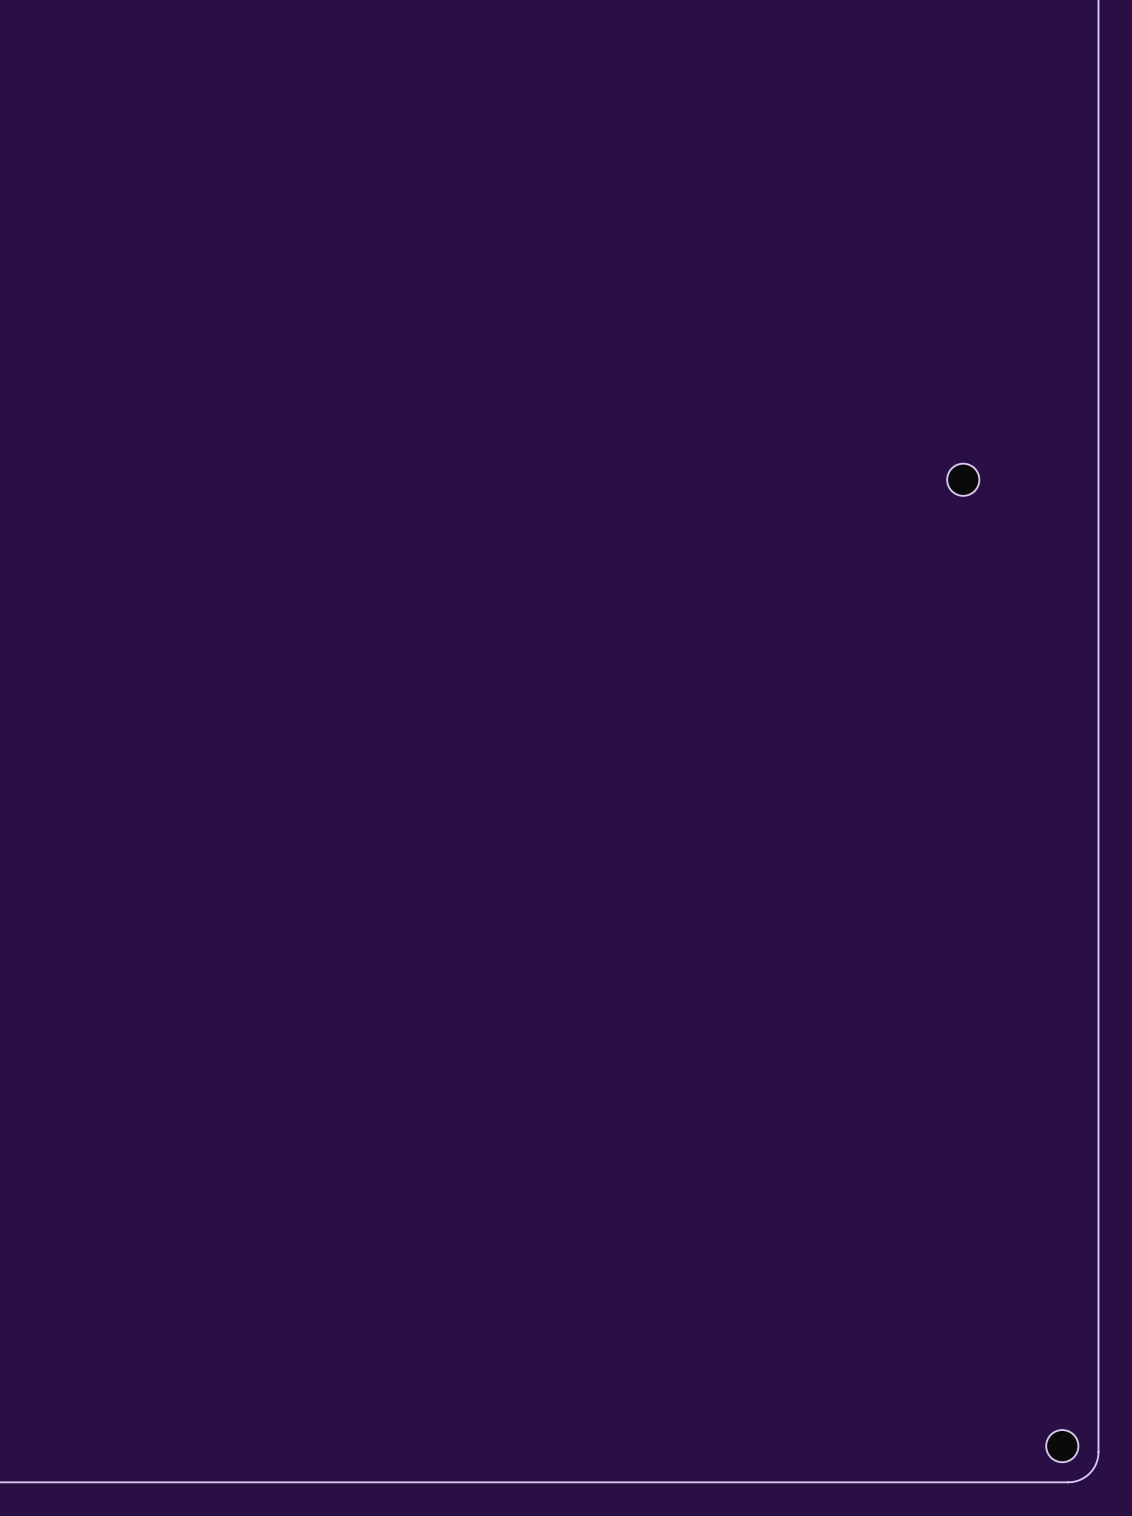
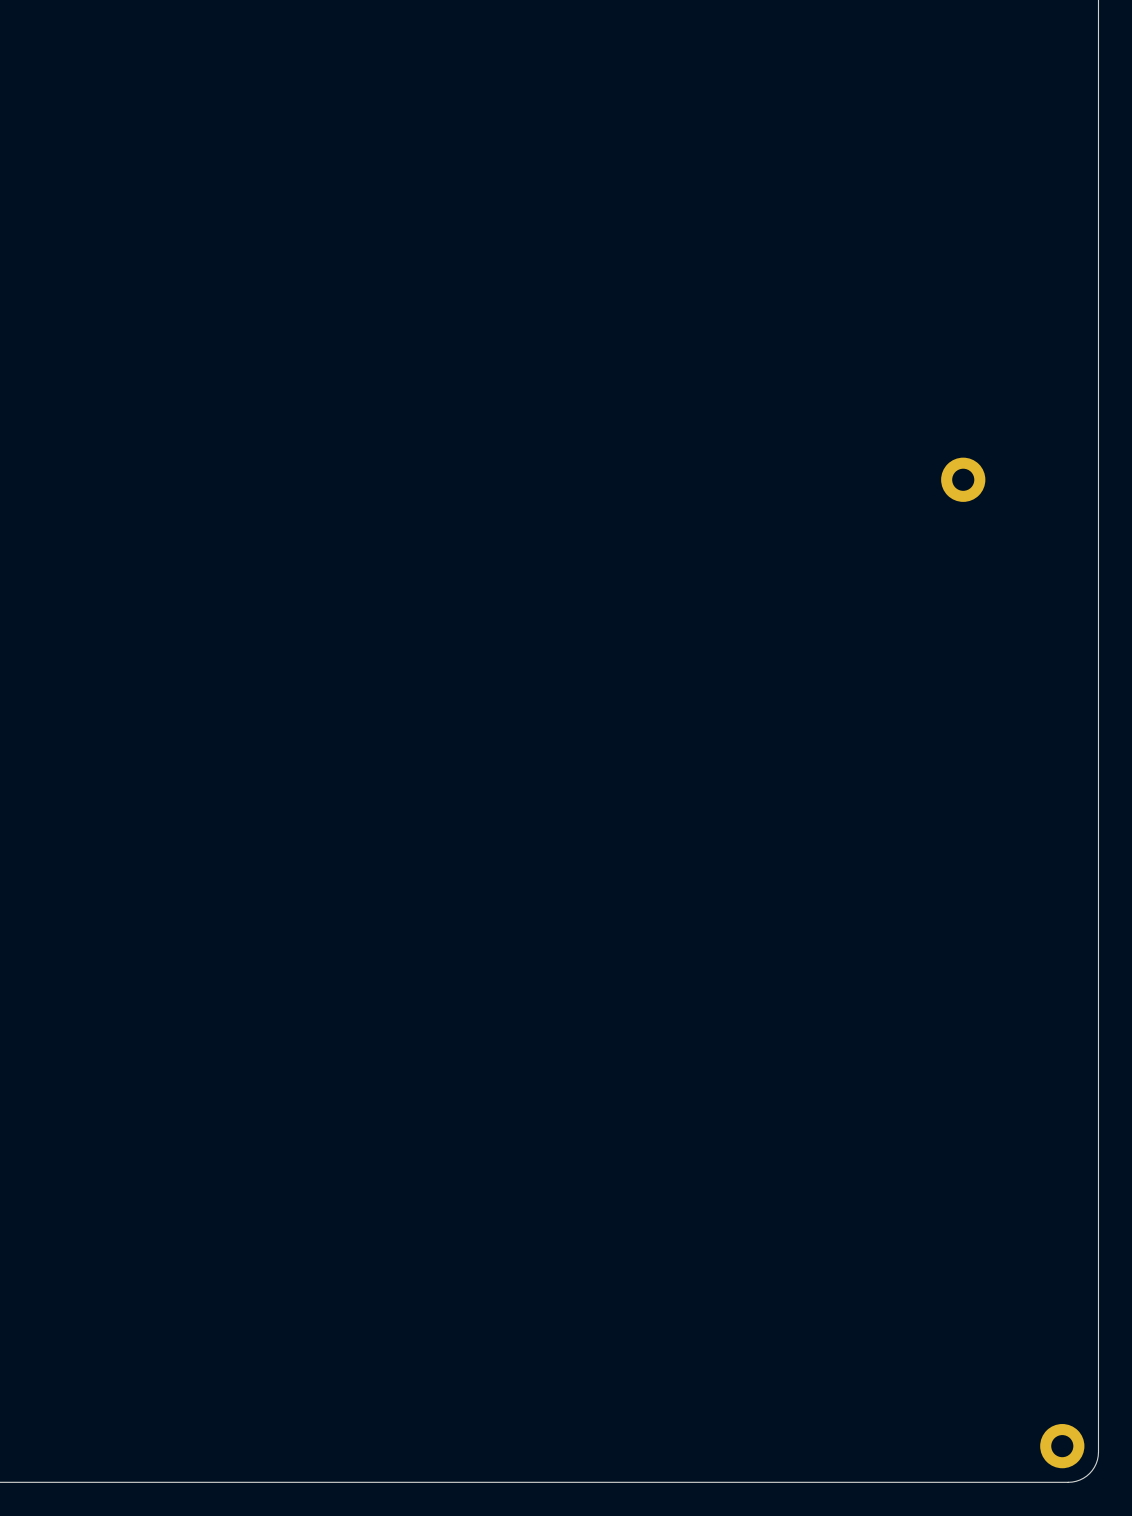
part footprint: [947, 463, 980, 496] -> [941, 457, 986, 502]
part footprint: [1046, 1430, 1079, 1463] -> [1040, 1424, 1085, 1469]

